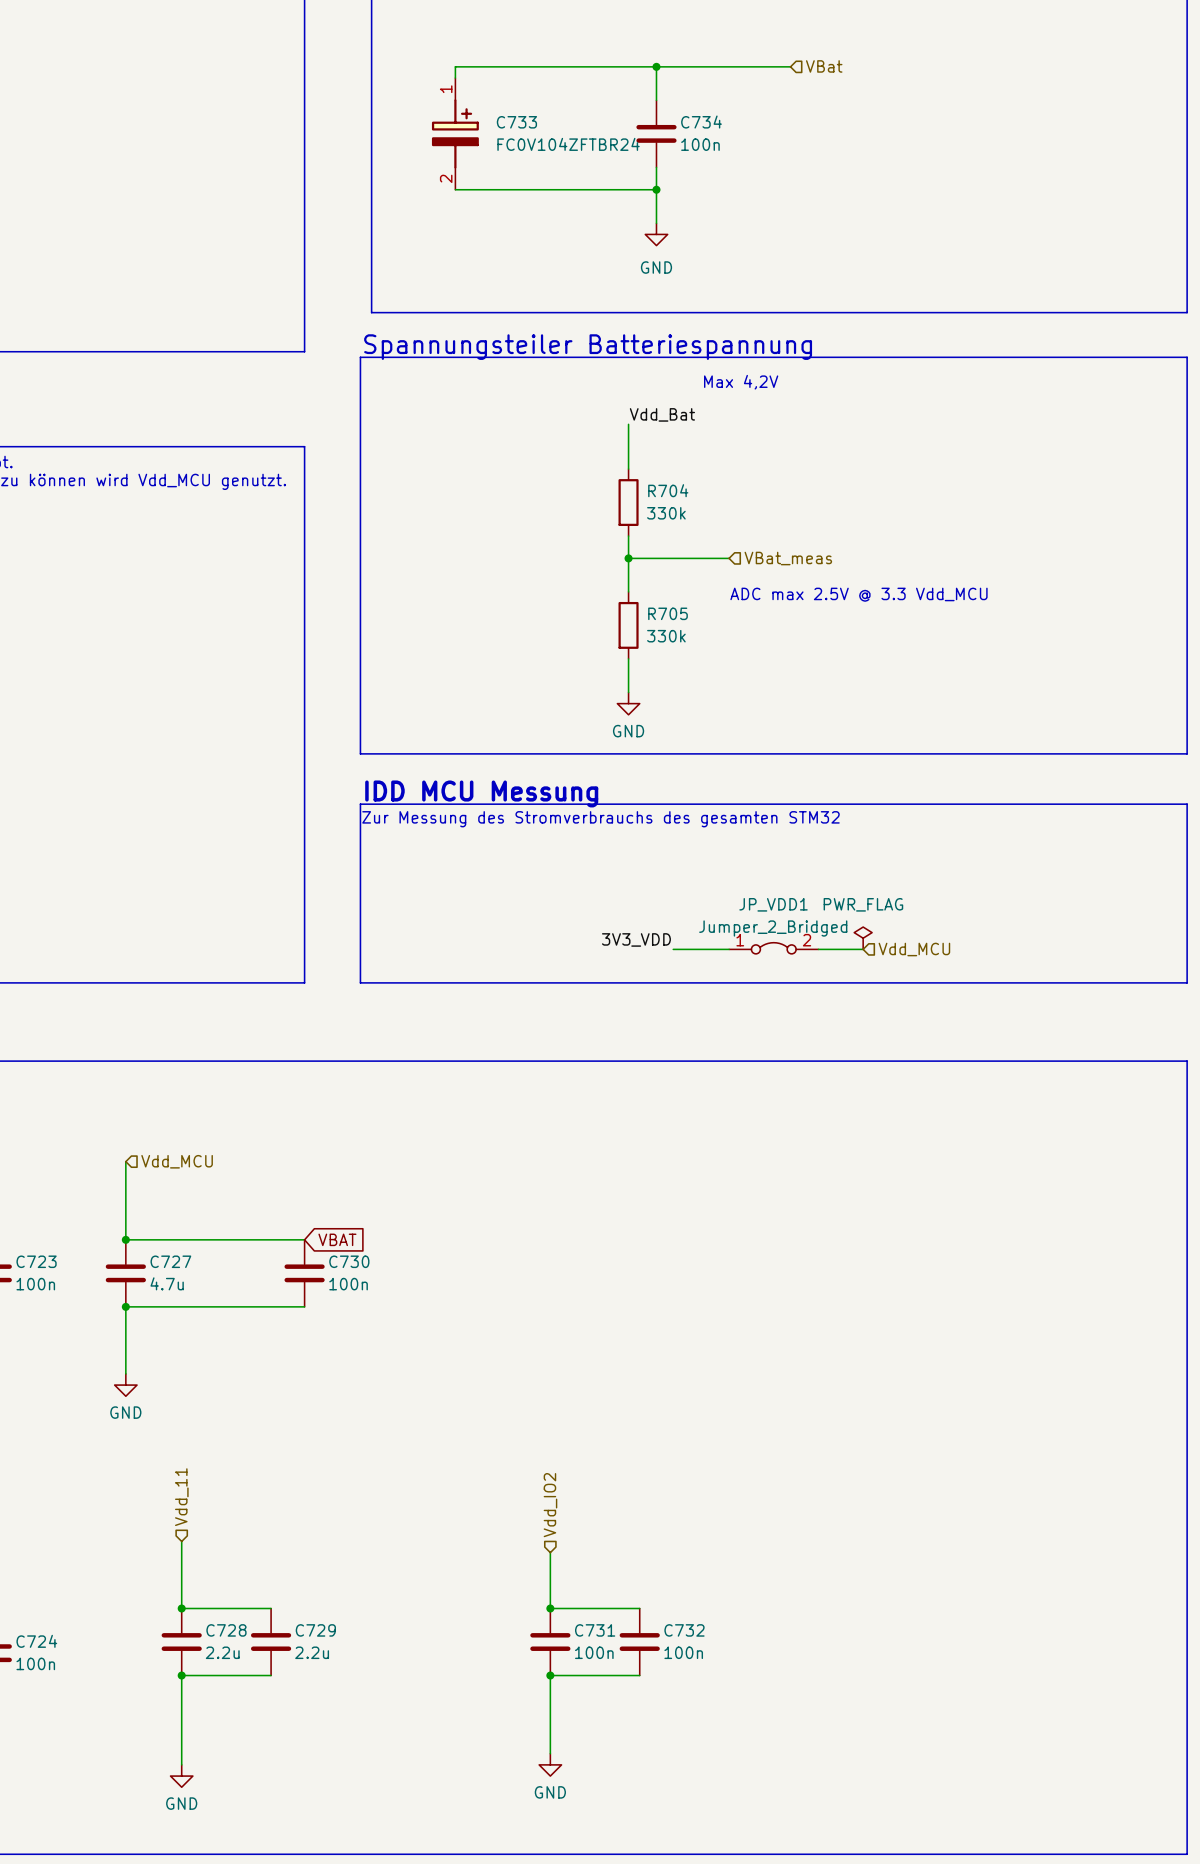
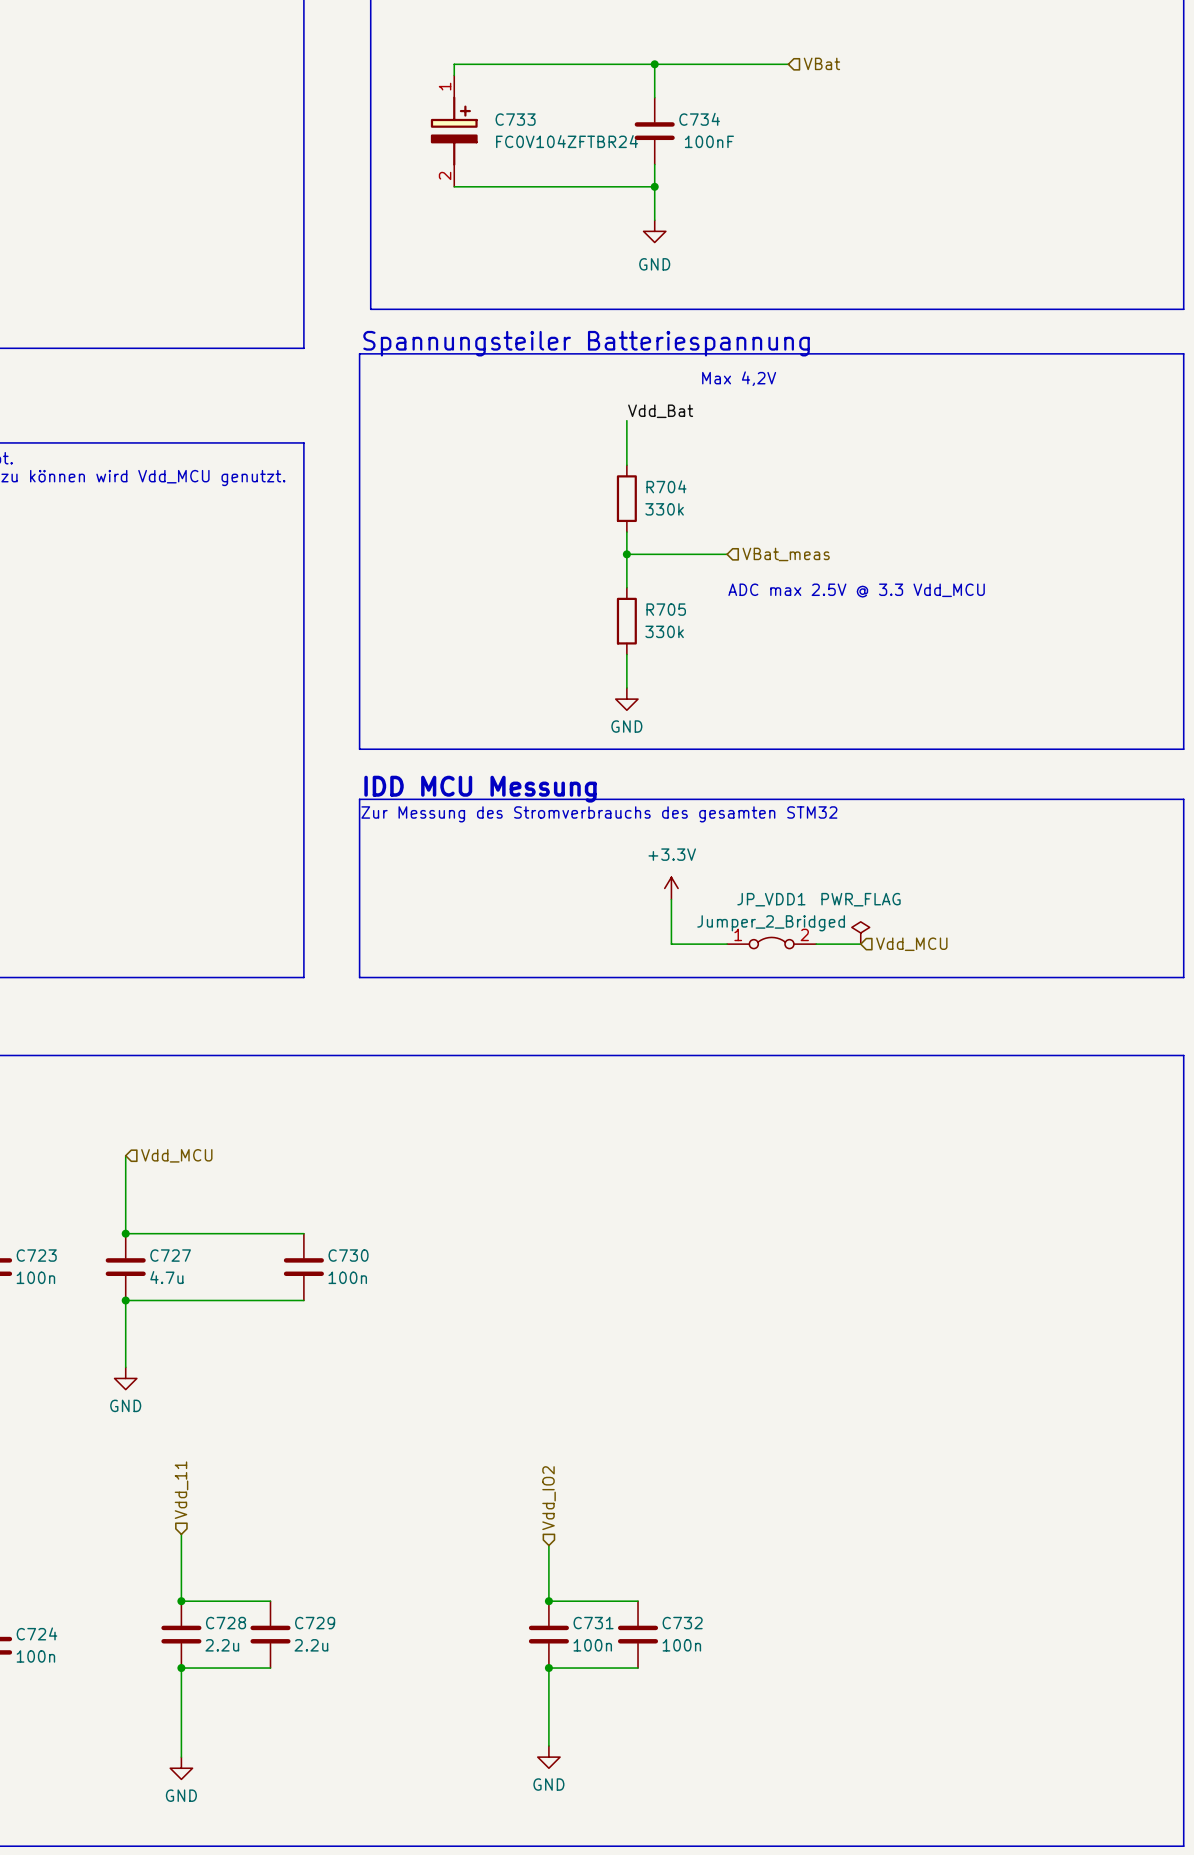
C734 value: 100n (700, 144) -> 100nF (709, 141)
power symbol: none -> +3.3V (671, 888)
wire: none -> (671, 899) (671, 944)
label: 3V3_VDD (636, 939) -> none
global label: VBAT (337, 1239) -> none

